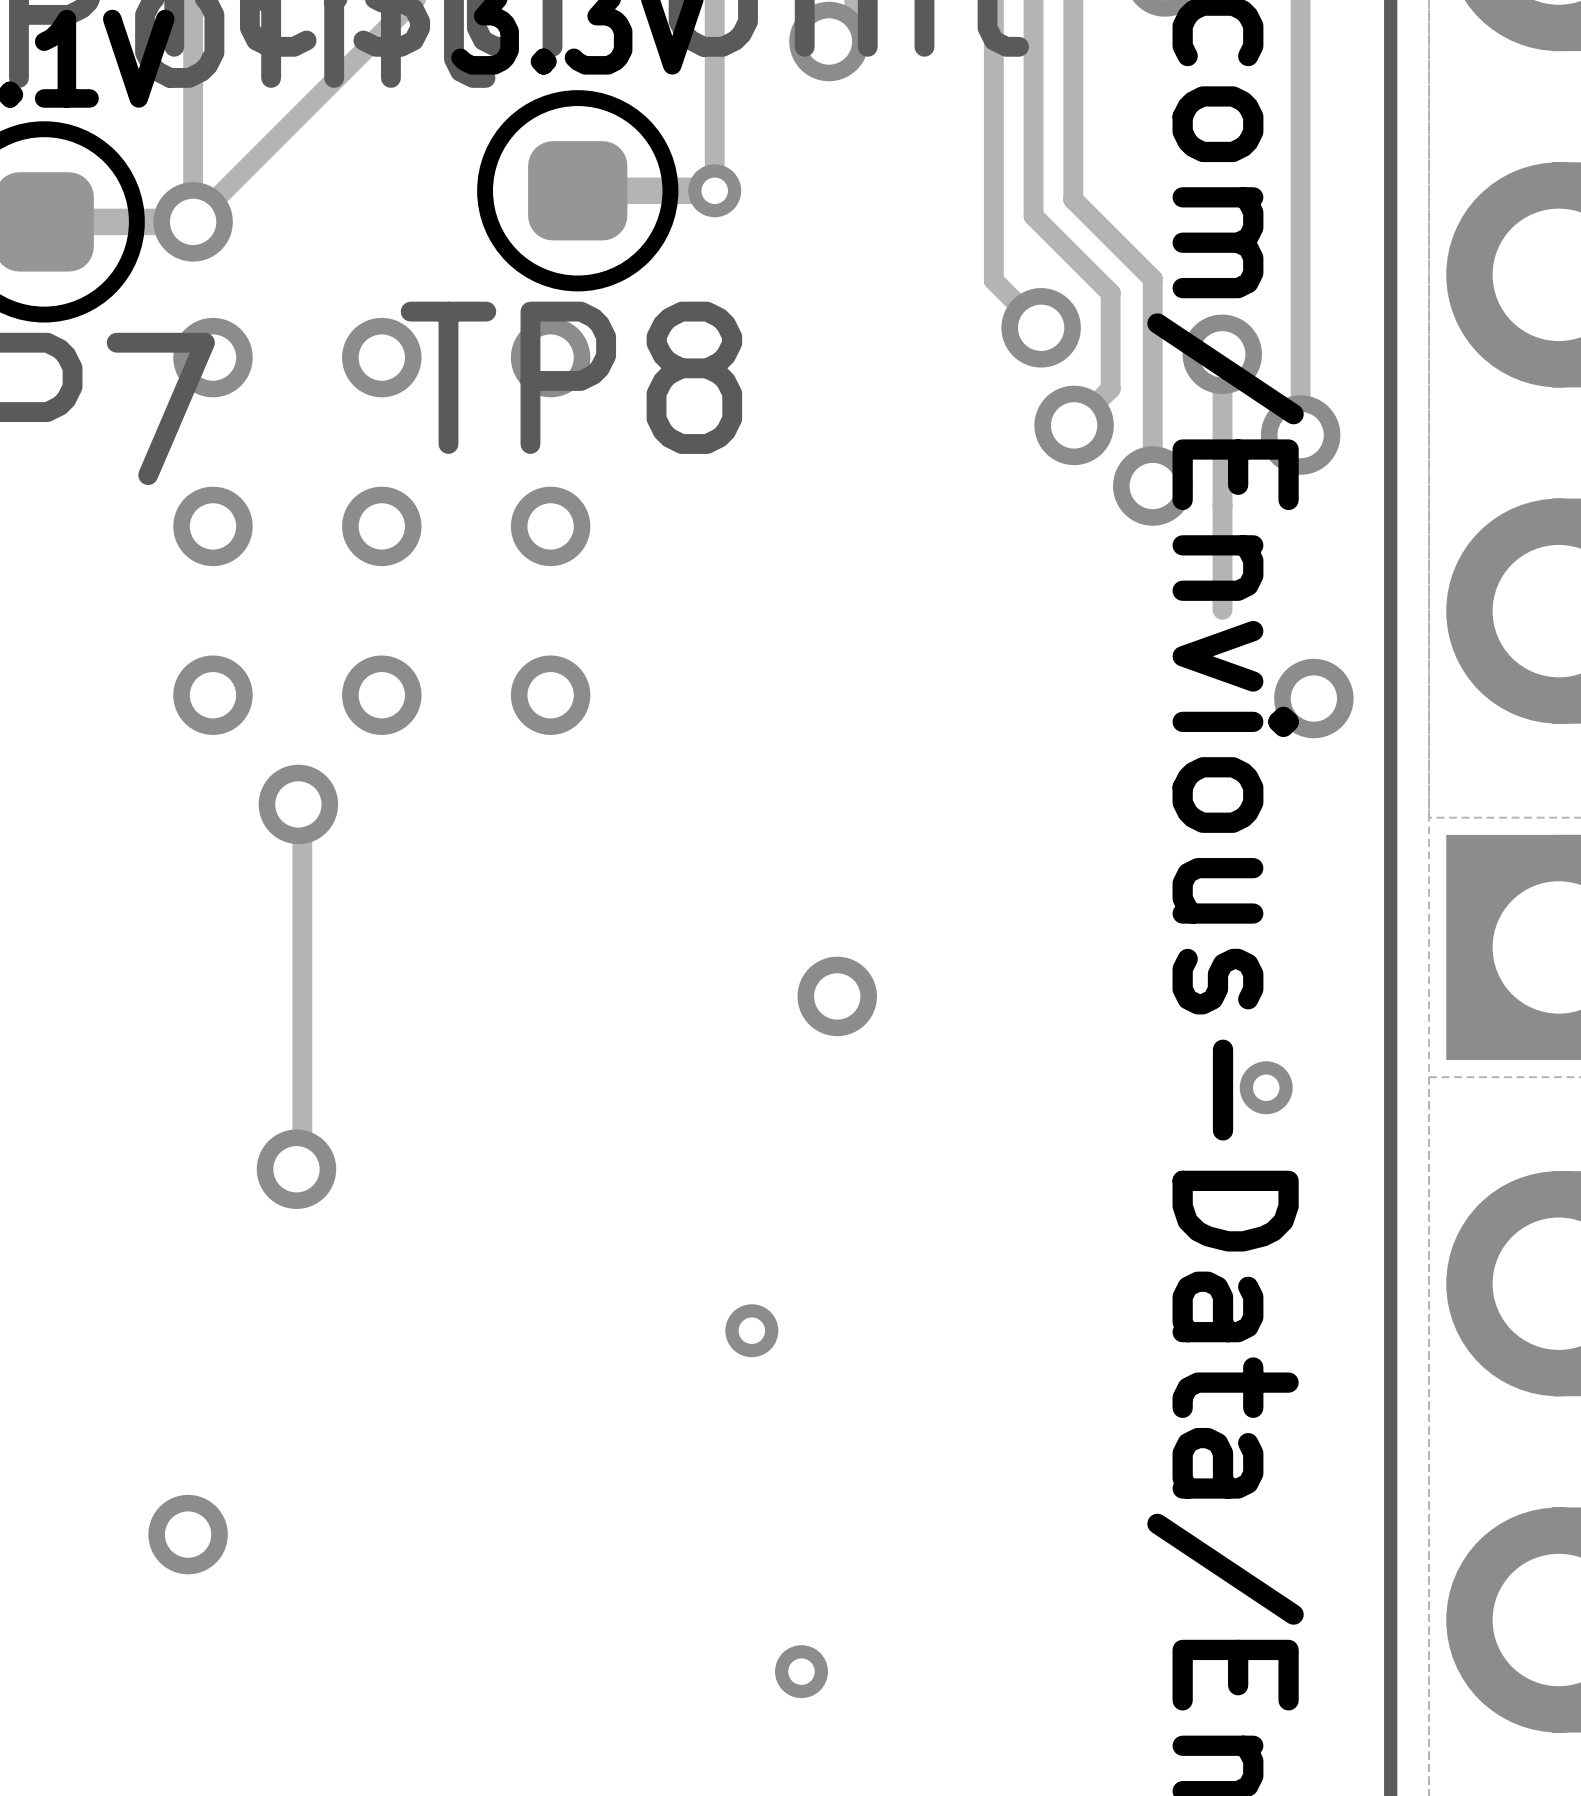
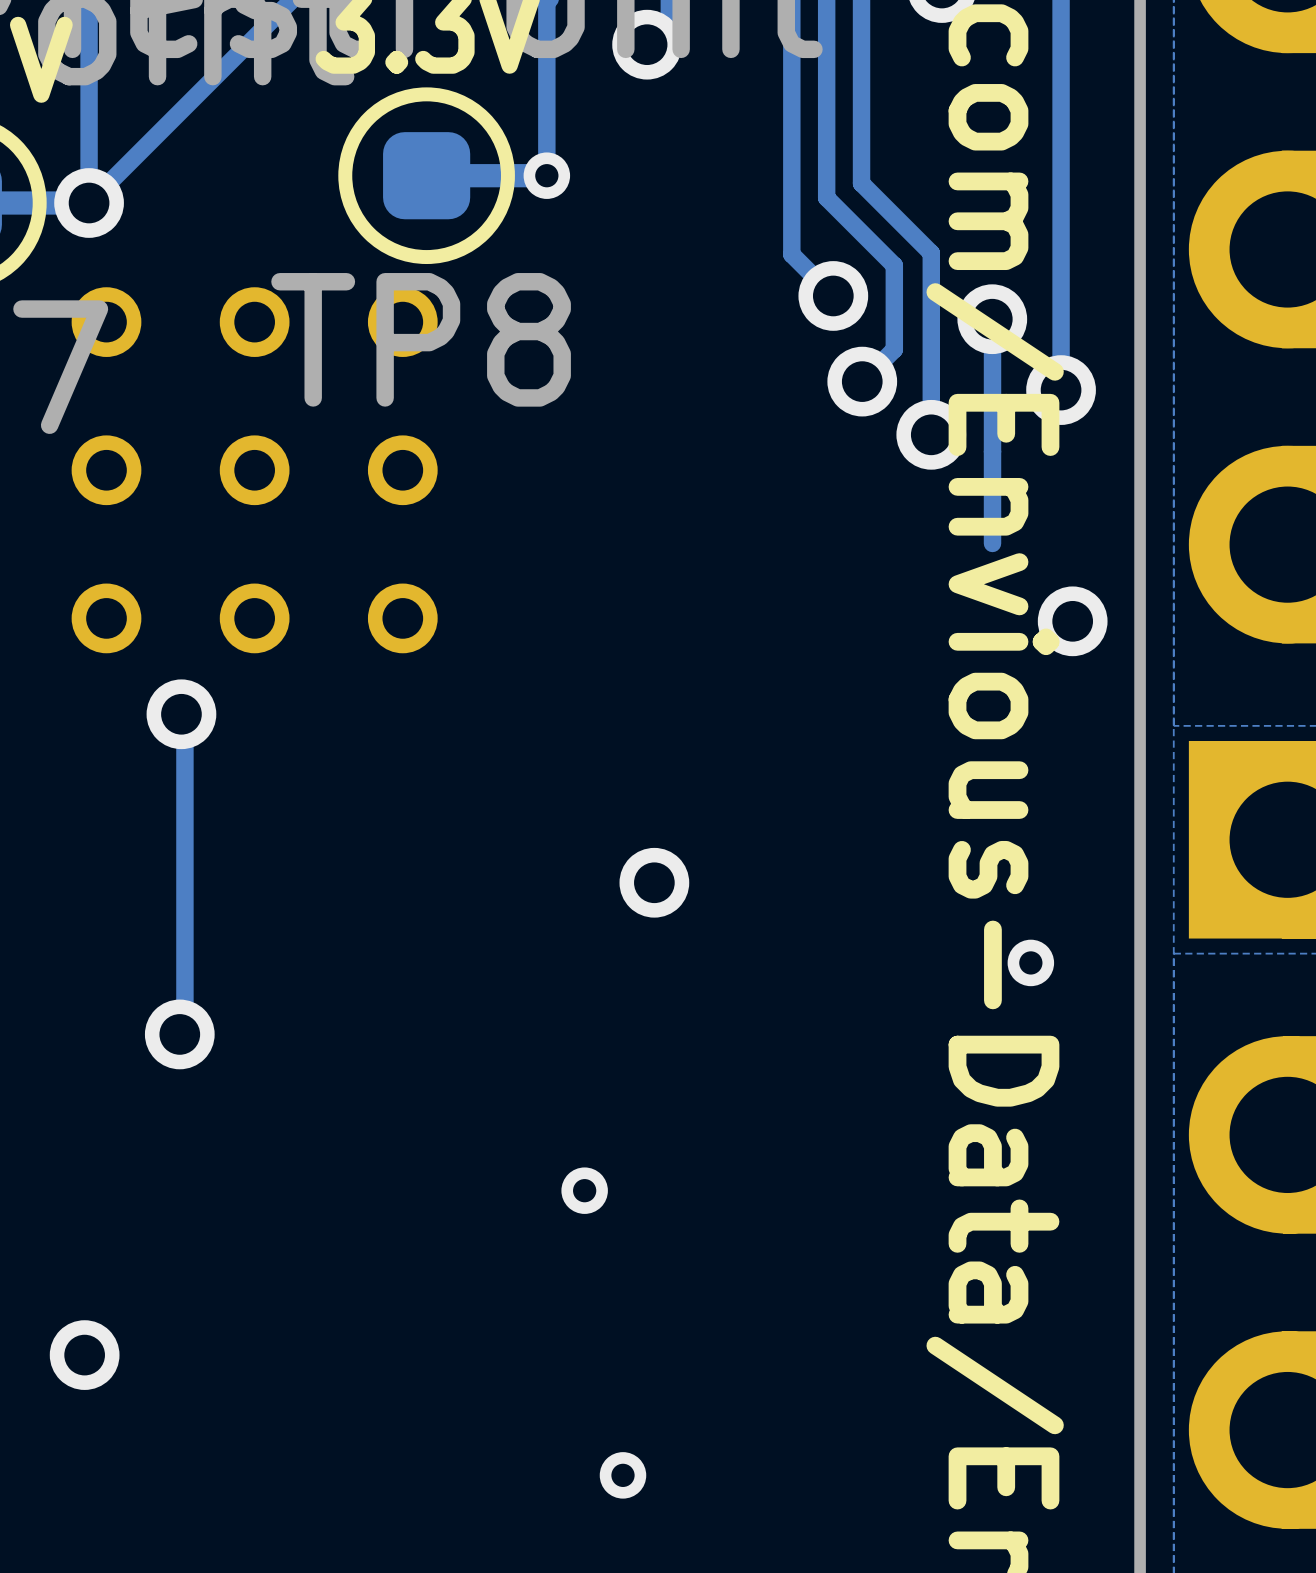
via position: (751, 1330) -> (584, 1190)

